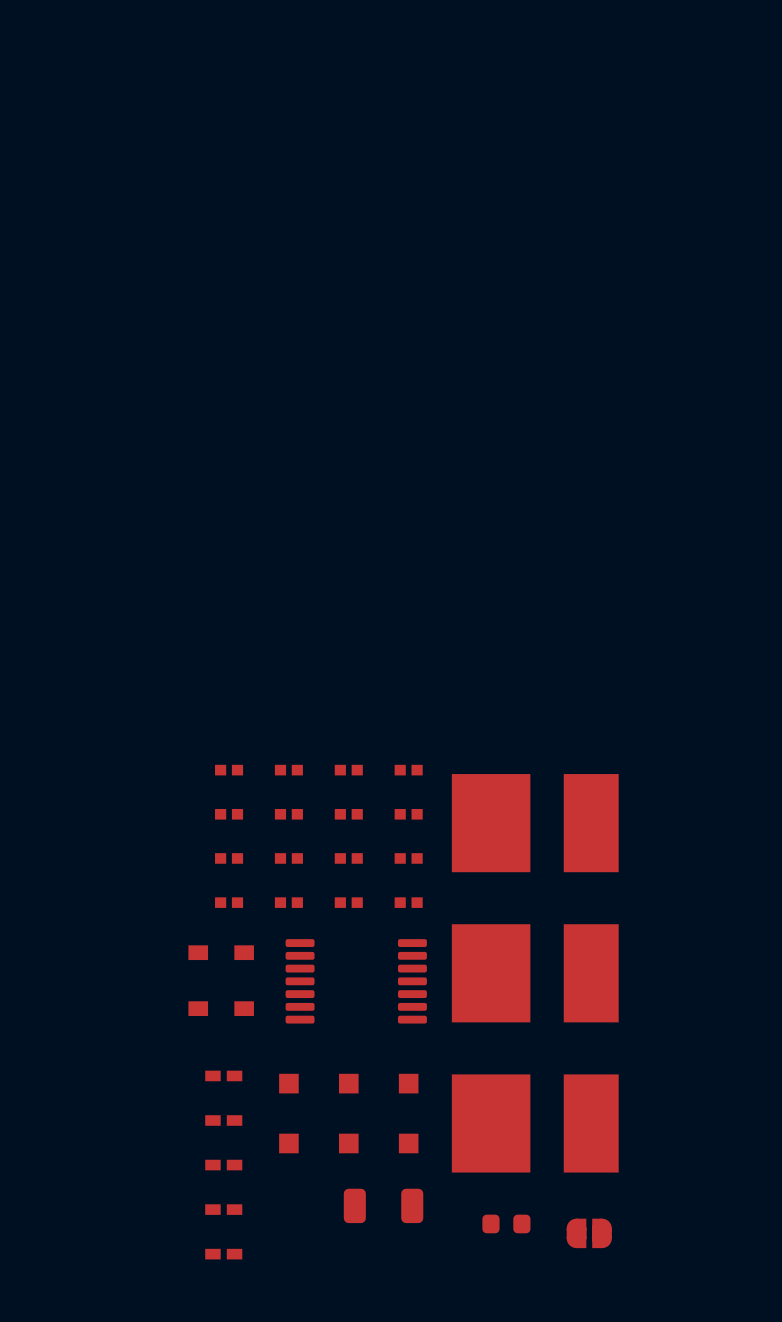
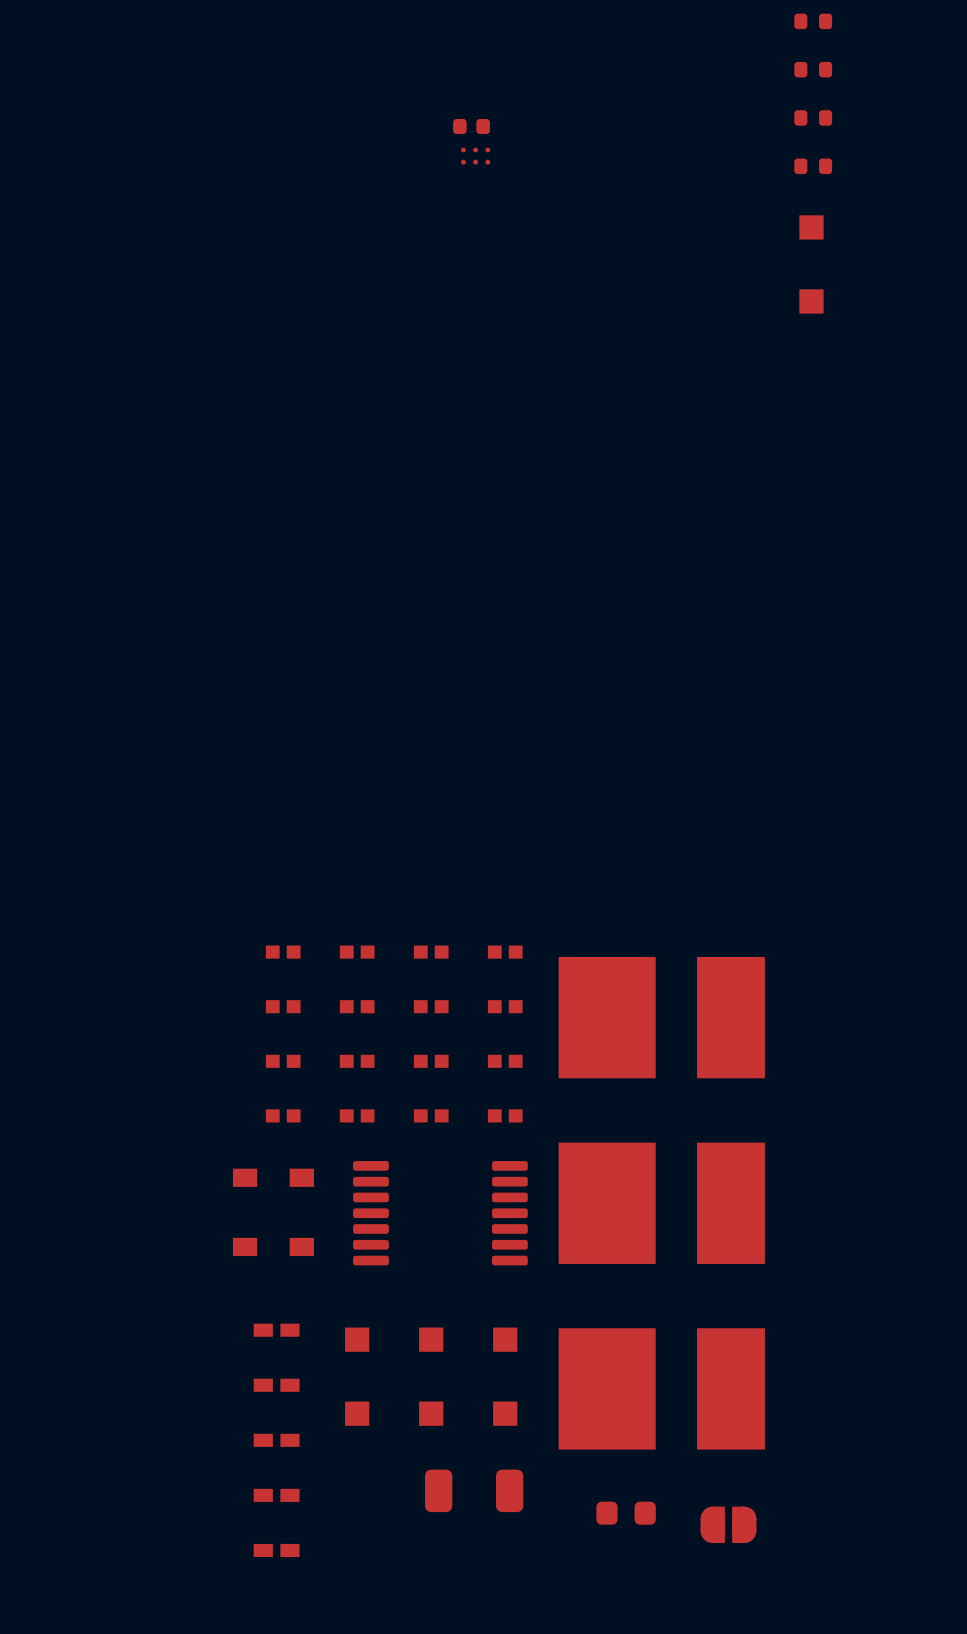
part: none -> (813, 21)
part: none -> (813, 69)
part: none -> (813, 117)
part: none -> (471, 126)
part: none -> (475, 156)
part: none -> (813, 166)
part: none -> (811, 227)
part: none -> (811, 301)

